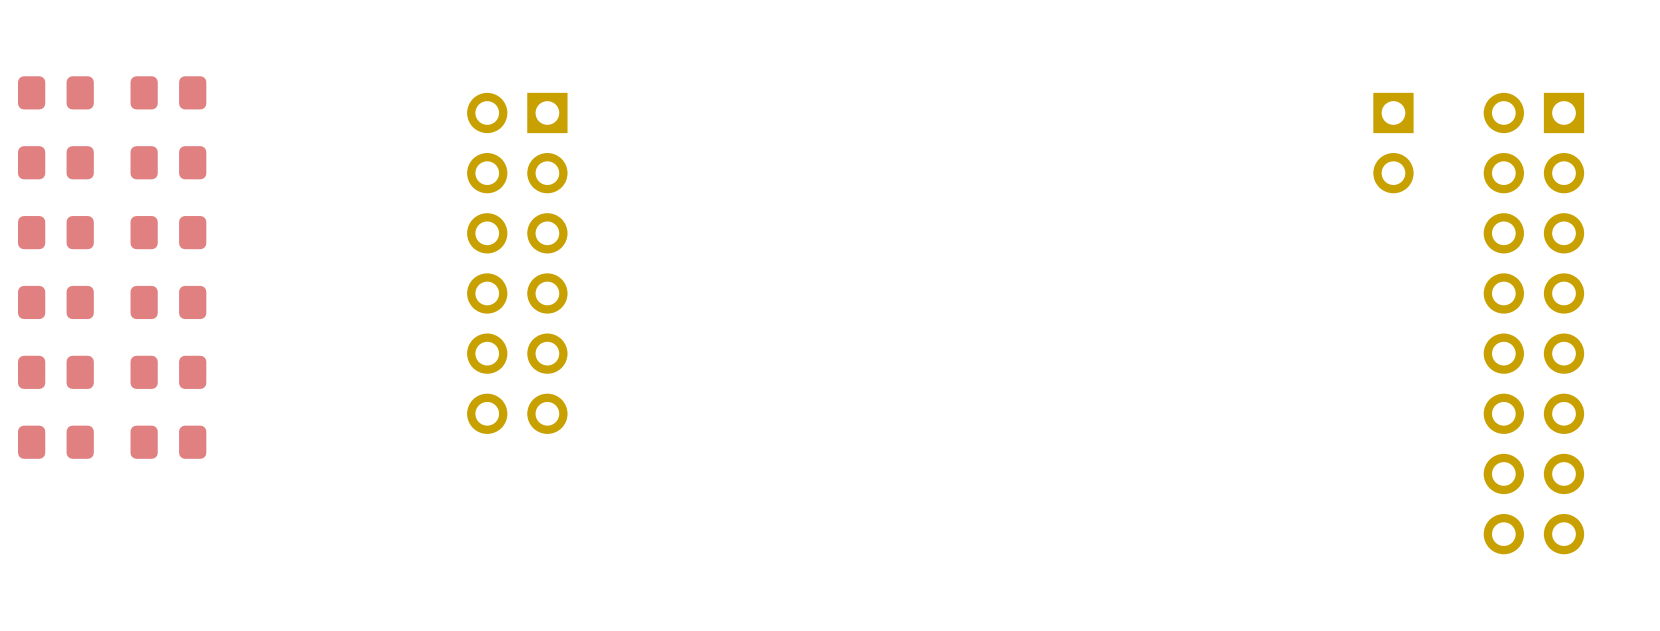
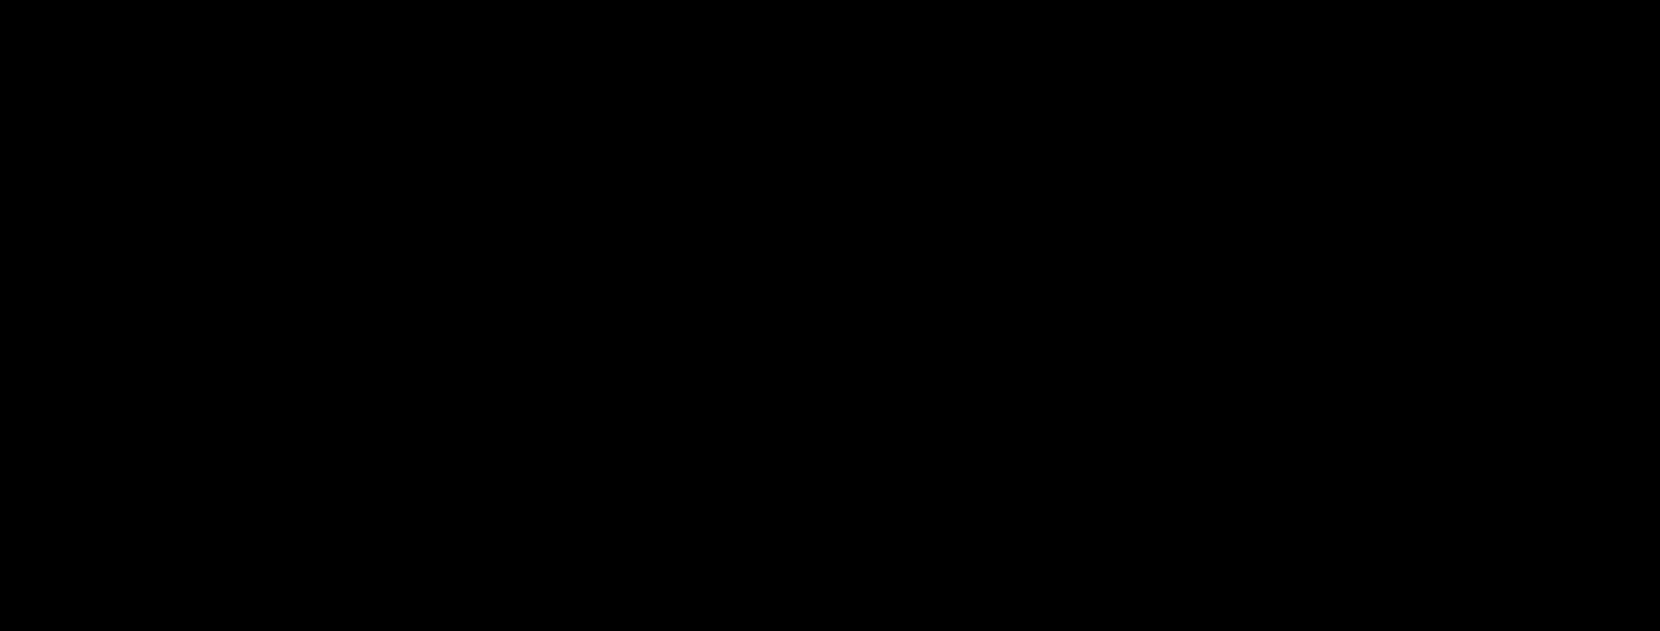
part: (55, 92) -> none
part: (168, 92) -> none
part: (1393, 143) -> none
part: (55, 162) -> none
part: (168, 162) -> none
part: (55, 232) -> none
part: (168, 232) -> none
part: (517, 263) -> none
part: (55, 302) -> none
part: (168, 302) -> none
part: (1533, 323) -> none
part: (55, 372) -> none
part: (168, 372) -> none
part: (55, 442) -> none
part: (168, 442) -> none

